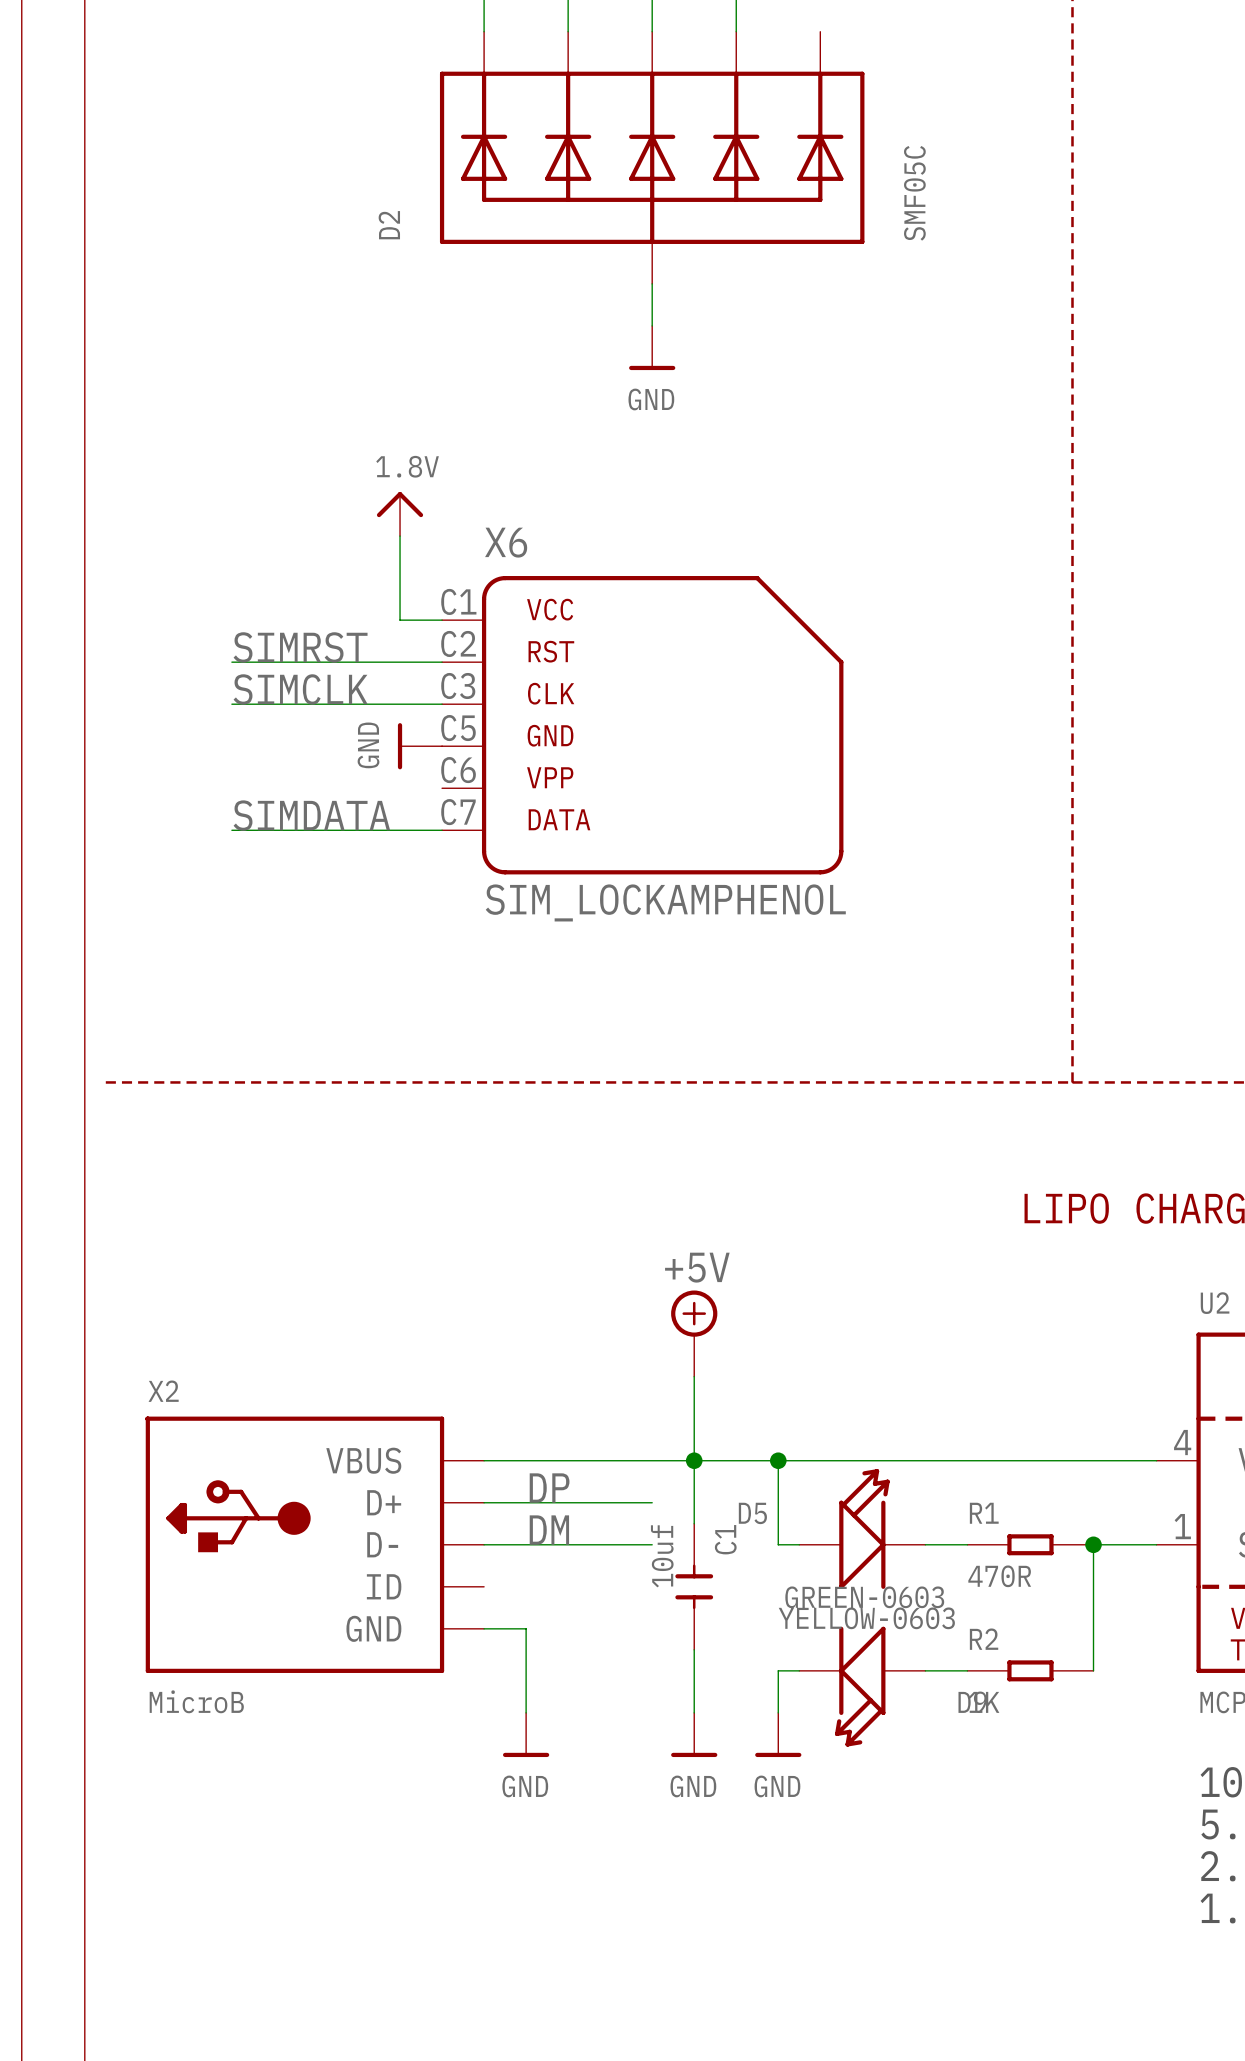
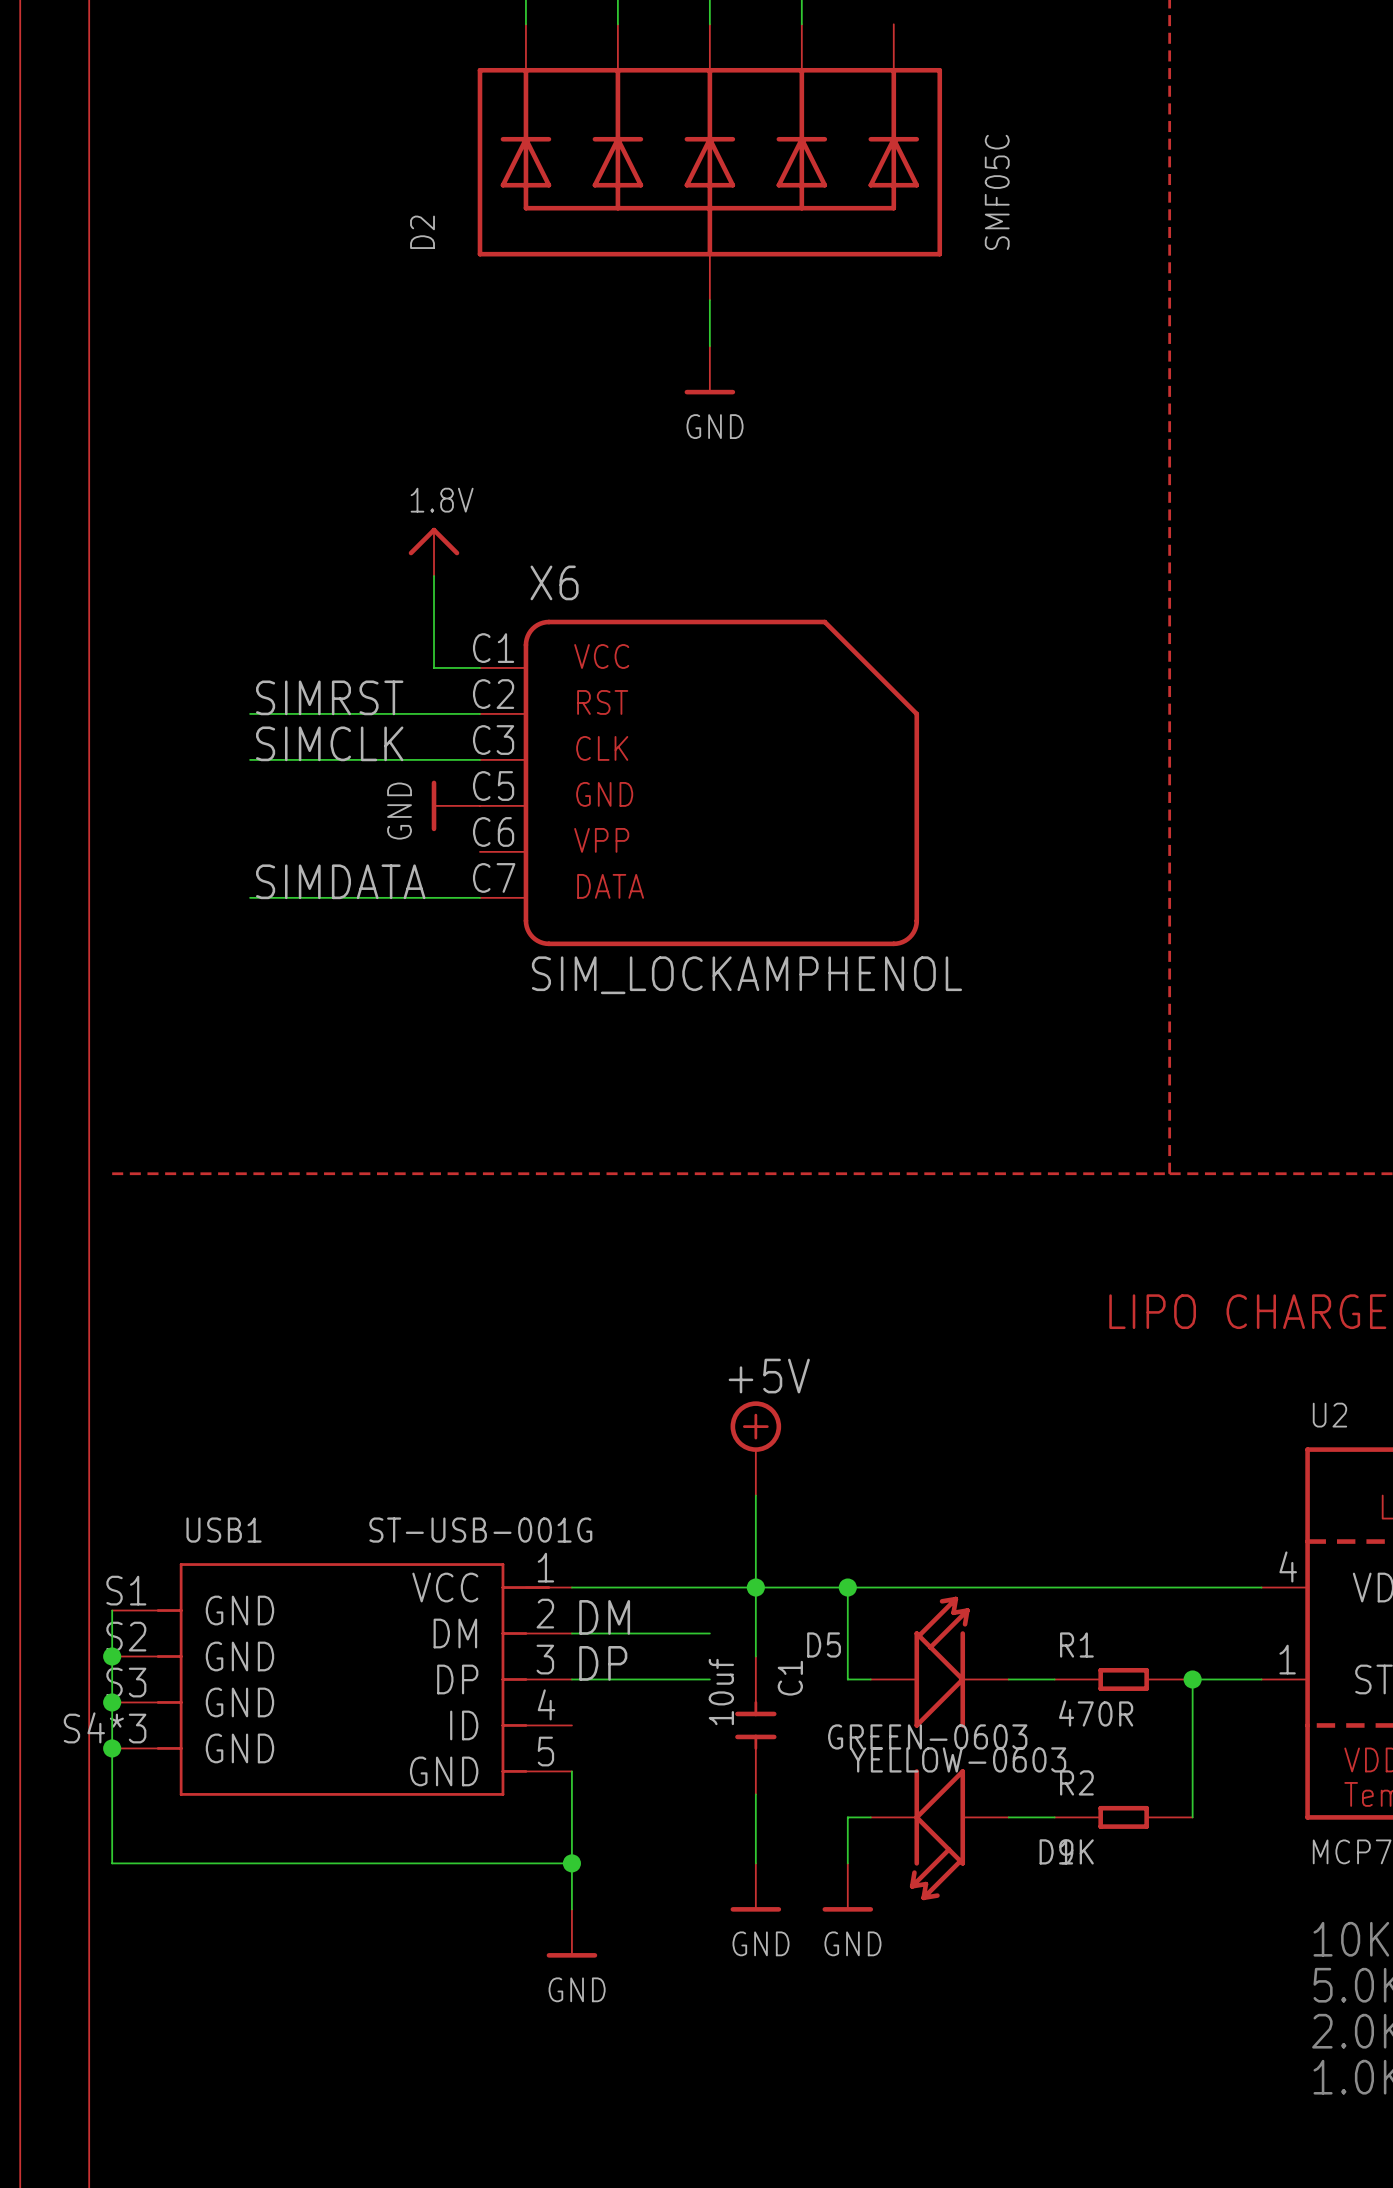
wire: none -> (112, 1610) (112, 1863) (571, 1863) (571, 1909)
label: DP (549, 1488) -> DM (604, 1617)
junction: none -> (112, 1656)
label: DM (549, 1530) -> DP (603, 1663)
X2: MicroB (314, 1544) -> none
USB1: none -> ST-USB-001G (342, 1679)
junction: none -> (112, 1702)
junction: none -> (112, 1748)
junction: none -> (571, 1863)
power symbol position: GND (526, 1734) -> GND (571, 1933)

